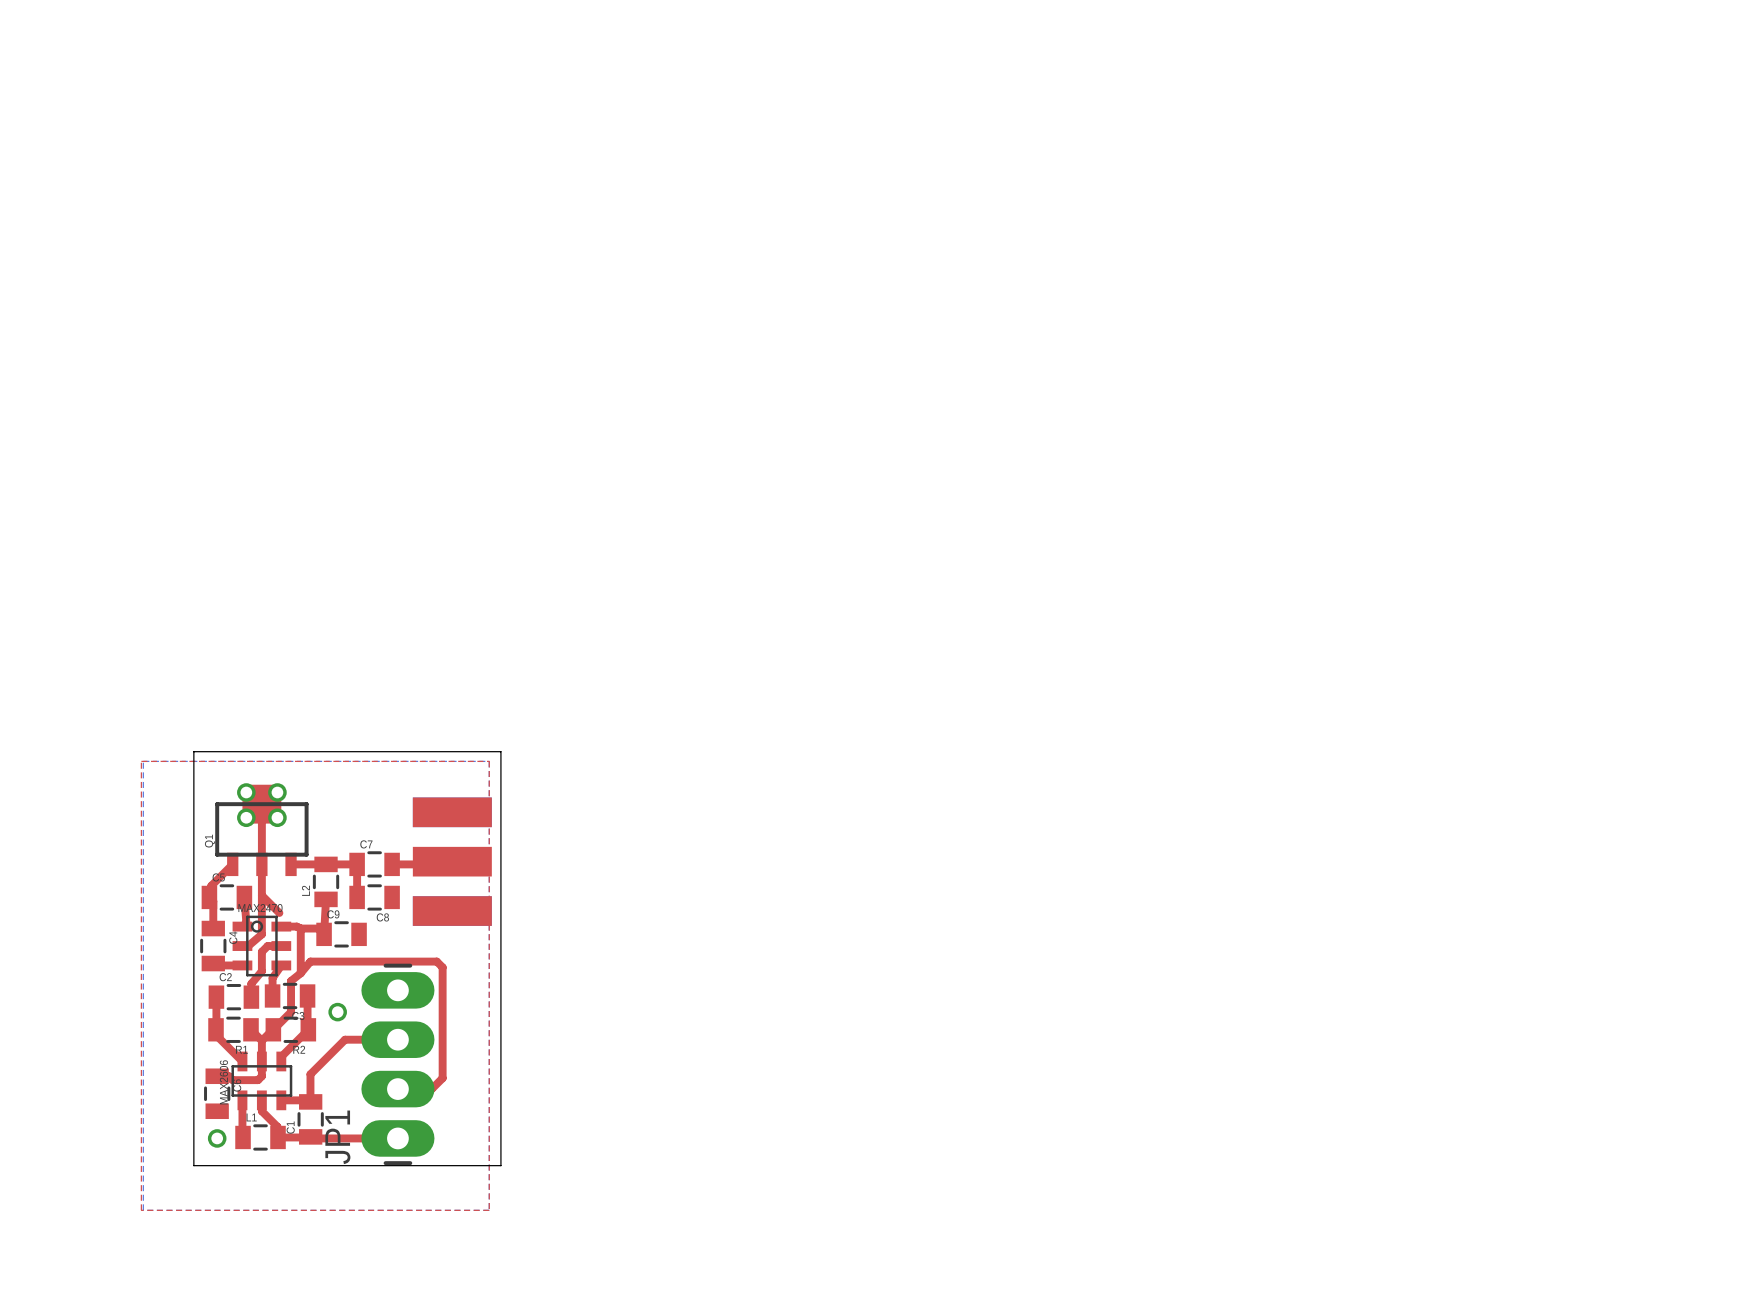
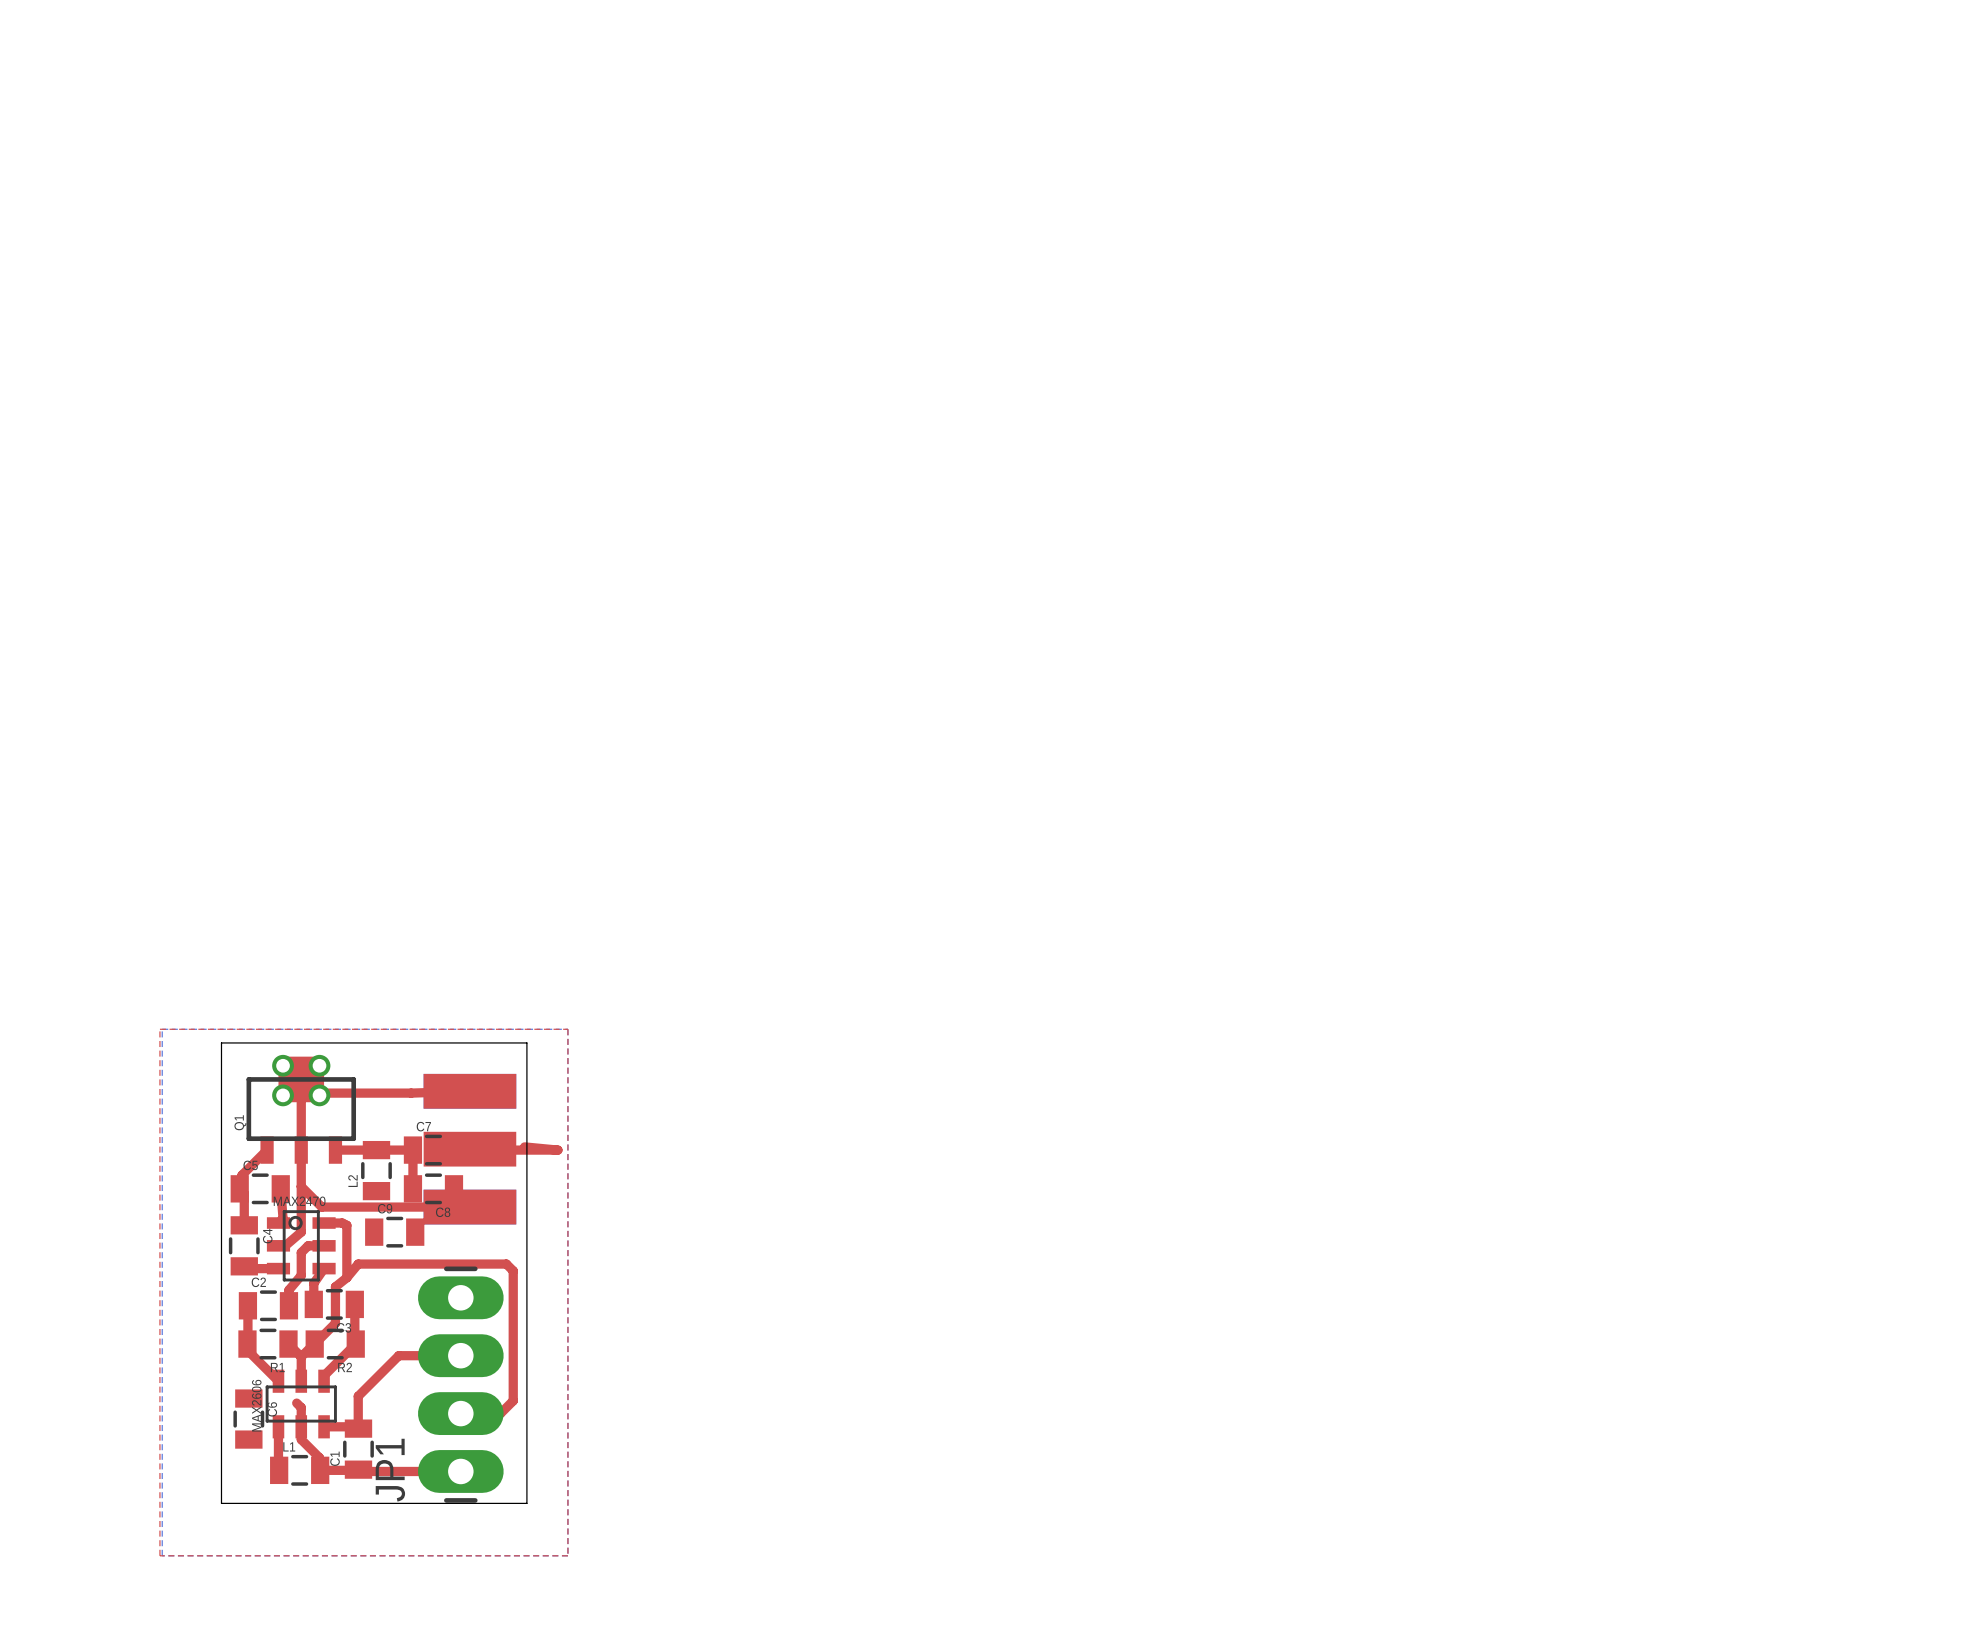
board edge: (193, 773) (193, 751) (500, 751) (500, 1165) (454, 1165) -> (221, 1042) (526, 1042) (526, 1503)
top track: none -> (469, 1091) (308, 1093)
part position: (452, 861) -> (469, 1149)
top track: (326, 899) (324, 934) (318, 928) (300, 928) -> none
top track: none -> (321, 1207) (469, 1207)
via: (337, 1012) -> none
top track: (261, 1061) (261, 1076) (258, 1080) (232, 1080) (228, 1076) (217, 1076) -> none
top track: none -> (296, 1403) (301, 1407) (301, 1426)
via: (217, 1138) -> none

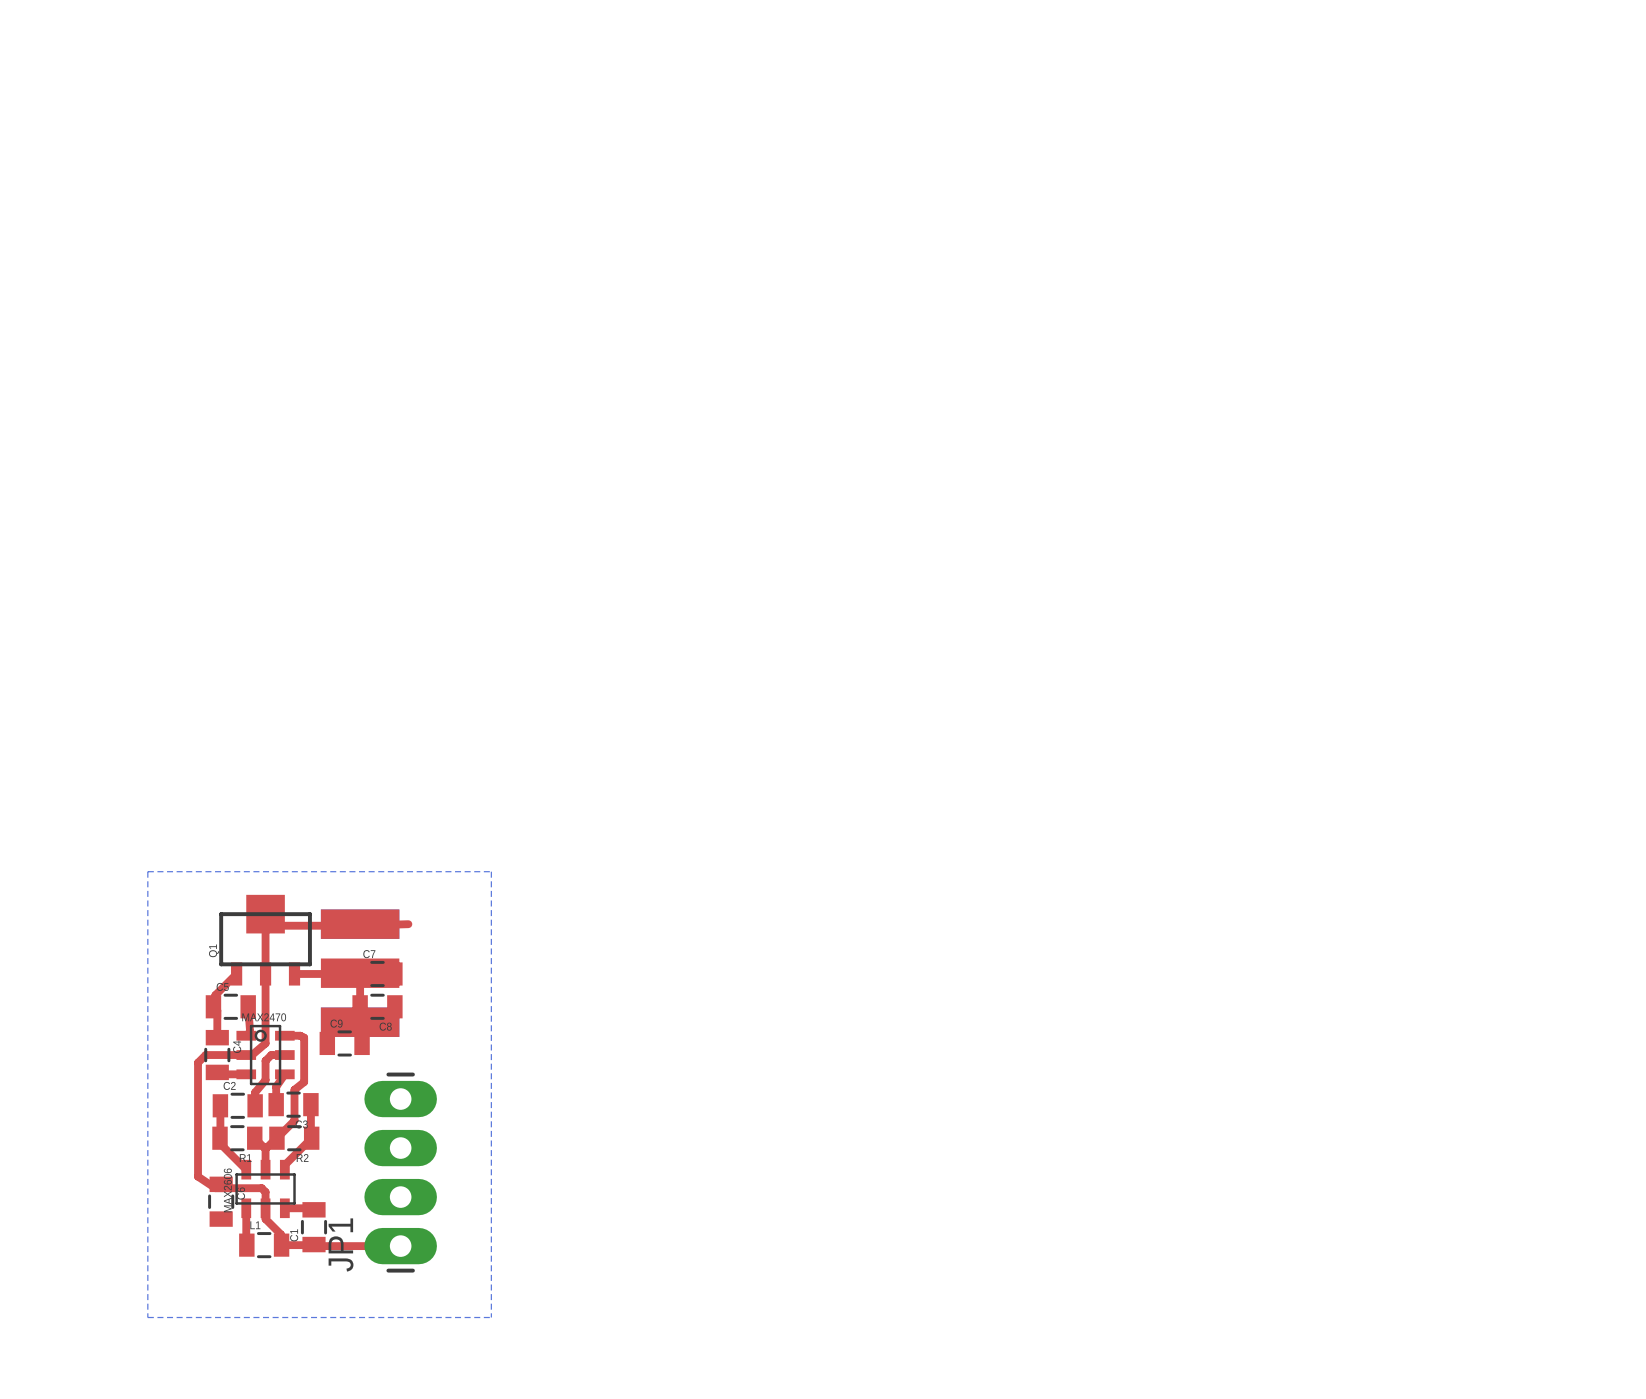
top zone outline: (159, 1029) (567, 1029) (567, 1555) (159, 1555) (159, 1029) -> none
board edge: (221, 1042) (526, 1042) (526, 1503) (221, 1503) (221, 1042) -> none
via: (283, 1065) -> none
via: (319, 1065) -> none
via: (283, 1095) -> none
via: (319, 1095) -> none
top track: (524, 1146) (557, 1150) (453, 1150) -> none
part position: (469, 1149) -> (360, 973)
L2: (376, 1170) -> none
top track: (301, 1186) (321, 1207) (469, 1207) -> none
top track: none -> (246, 1055) (205, 1055) (198, 1062) (198, 1176) (215, 1188) (261, 1188)
top track: (346, 1277) (358, 1264) (506, 1264) (513, 1270) (513, 1400) (500, 1413) (460, 1413) -> none
top track: (460, 1355) (398, 1355) (358, 1396) (358, 1428) -> none

